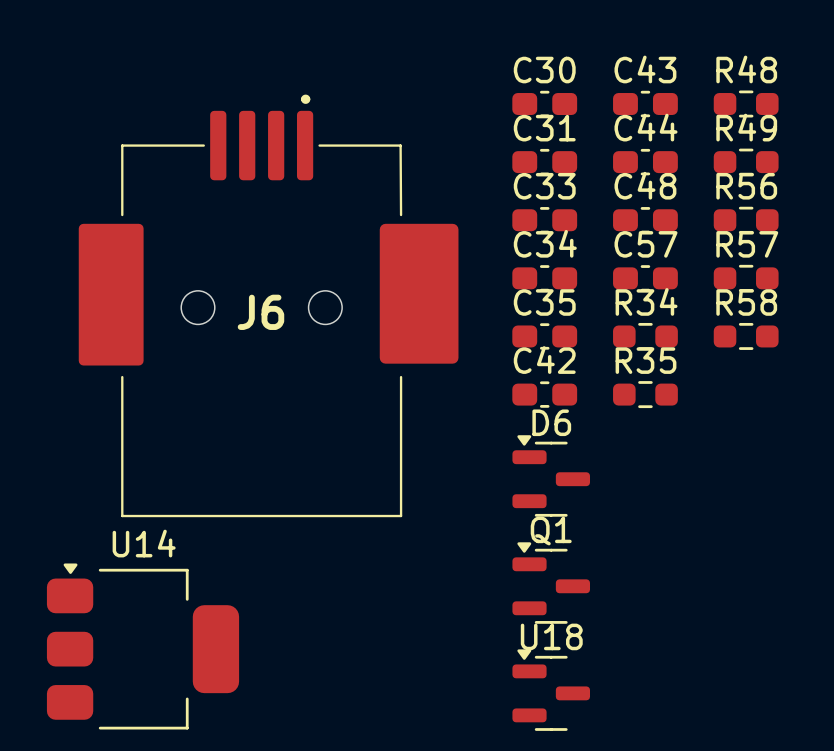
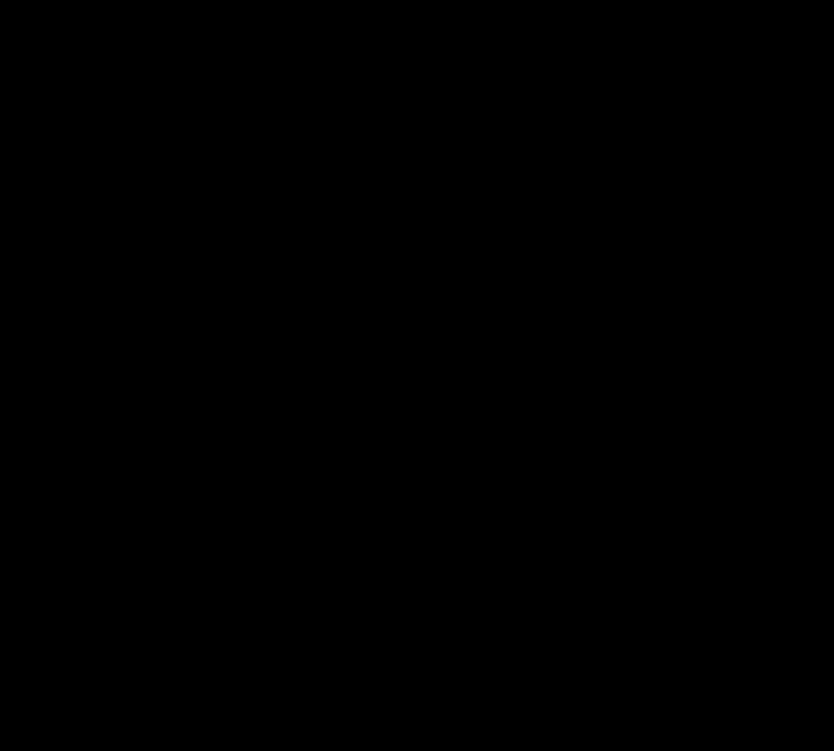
C30: (544, 104) -> none
C43: (645, 104) -> none
R48: (746, 104) -> none
C31: (544, 162) -> none
C44: (645, 162) -> none
R49: (746, 162) -> none
C33: (544, 220) -> none
C48: (645, 220) -> none
R56: (746, 220) -> none
C34: (544, 278) -> none
C57: (645, 278) -> none
R57: (746, 278) -> none
J6: (268, 305) -> none
C35: (544, 336) -> none
R34: (645, 336) -> none
R58: (746, 336) -> none
C42: (544, 394) -> none
R35: (645, 394) -> none
D6: (551, 475) -> none
Q1: (551, 583) -> none
U14: (143, 646) -> none
U18: (551, 690) -> none

